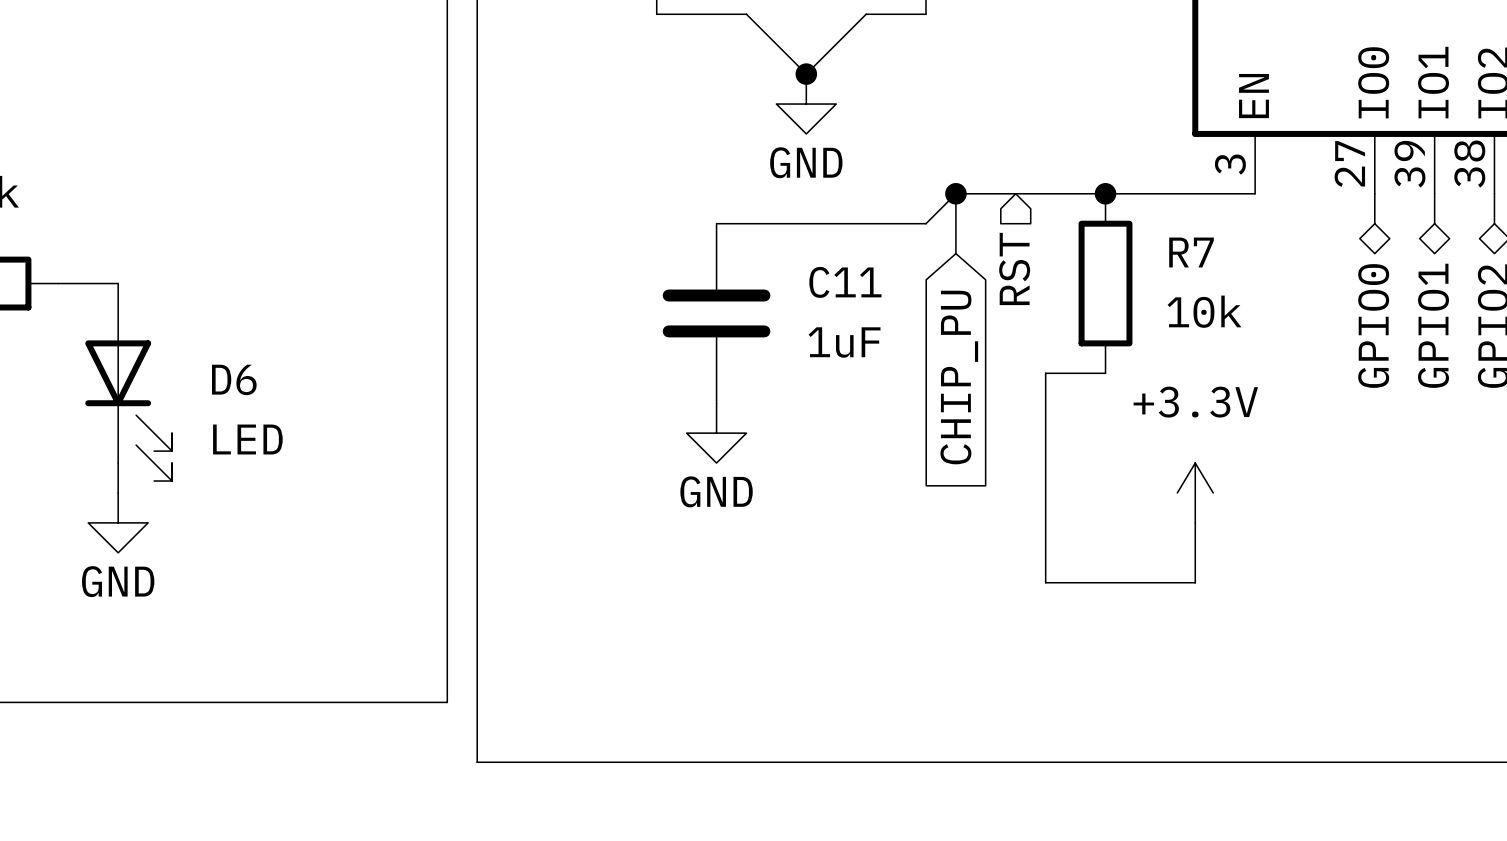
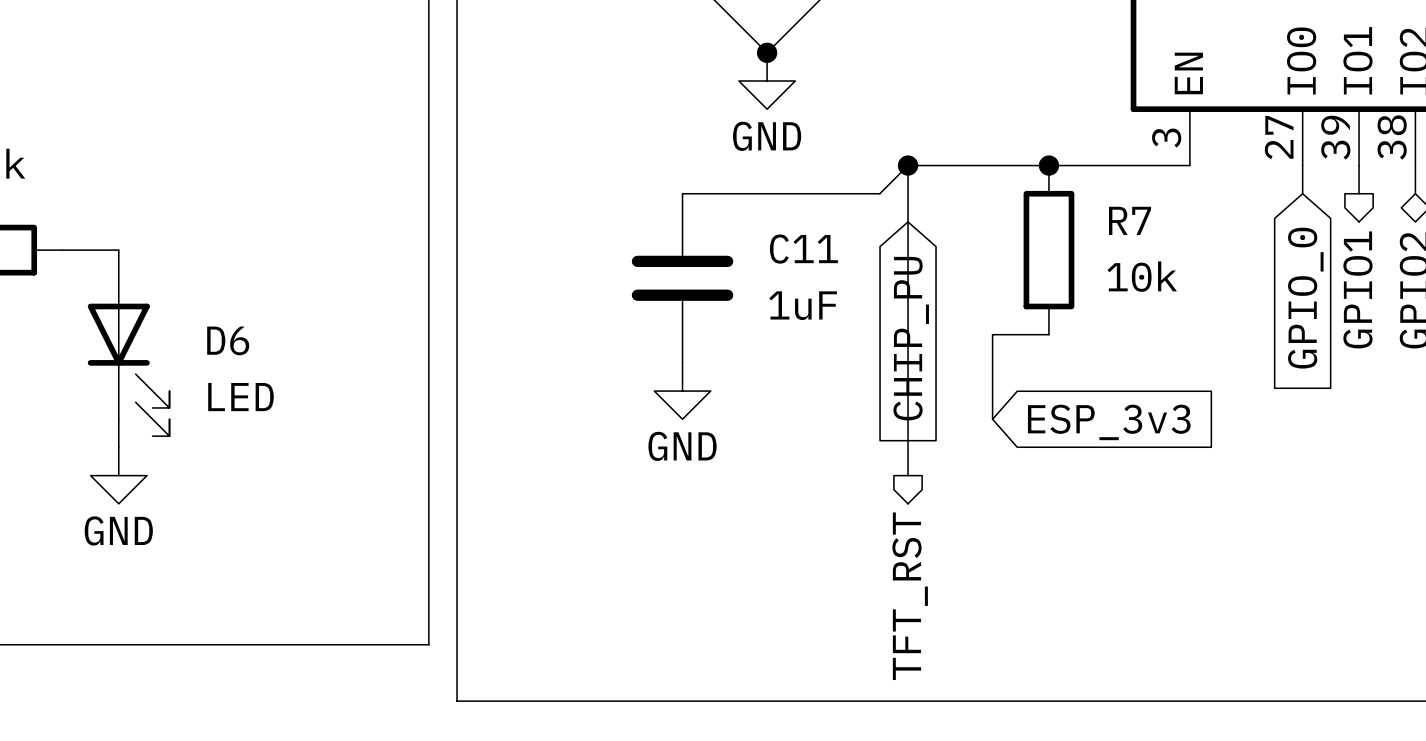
wire: none -> (908, 221) (908, 475)
hierarchical label: RST (1014, 268) -> none
hierarchical label shape: bidirectional (1433, 325) -> output (1357, 289)
hierarchical label: GPIO0 (1373, 326) -> none
global label: none -> GPIO_0 (1305, 298)
wire: (1045, 463) (1045, 582) (1195, 582) (1195, 522) -> none
global label: none -> ESP_3v3 (1109, 422)
power symbol: +3.3V (1195, 492) -> none
hierarchical label: none -> TFT_RST (910, 596)

